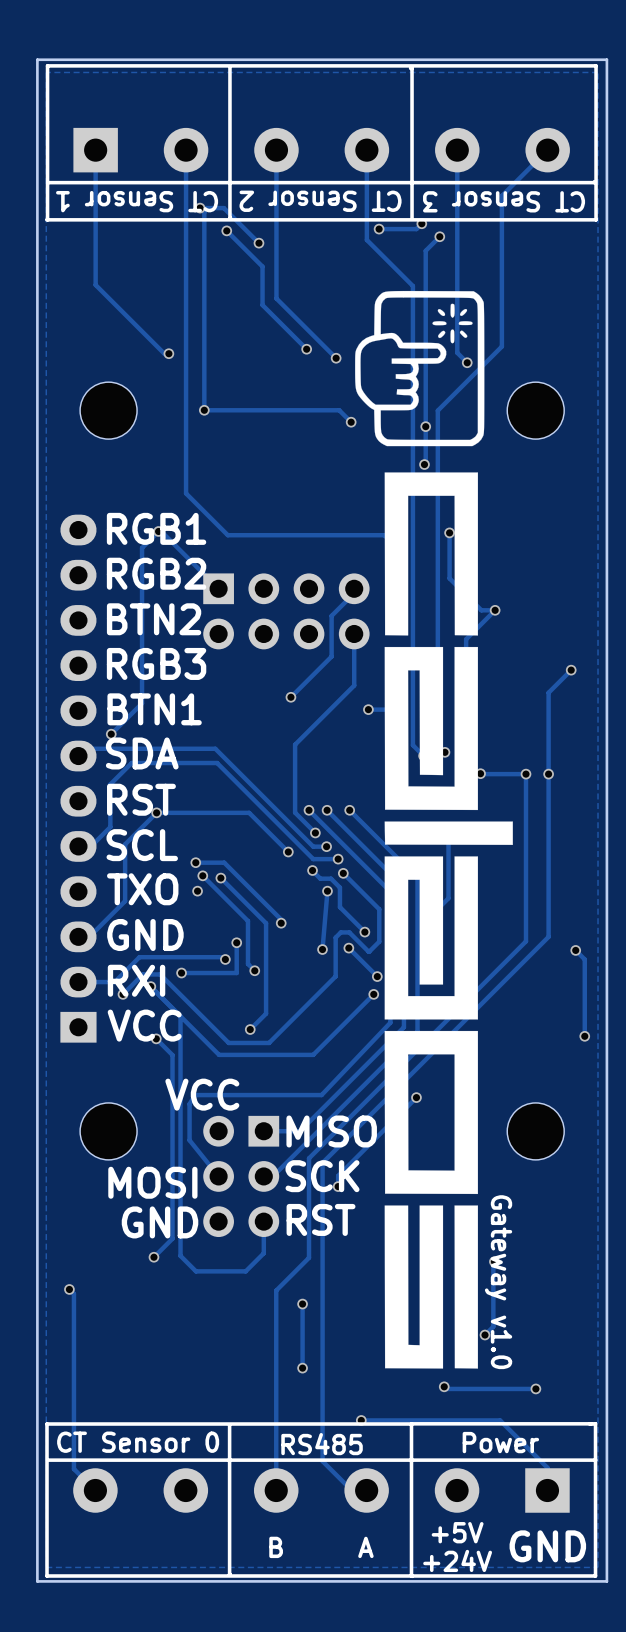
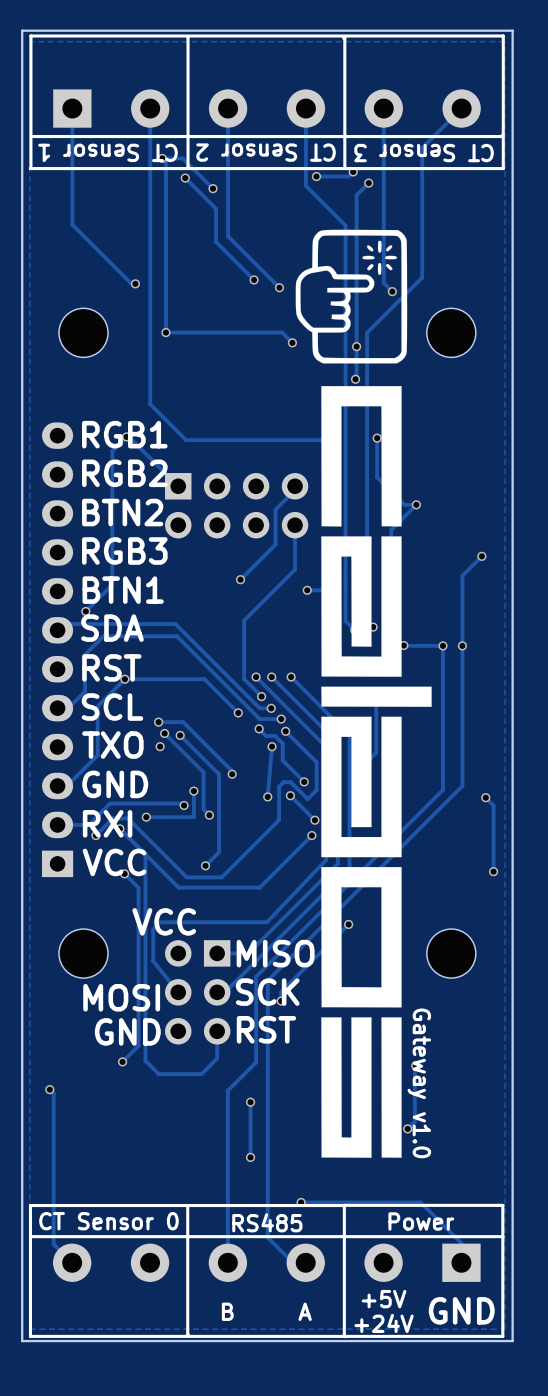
track: (444, 1386) (446, 1388) (535, 1388) -> none
via: (444, 1386) -> none
via: (535, 1388) -> none

